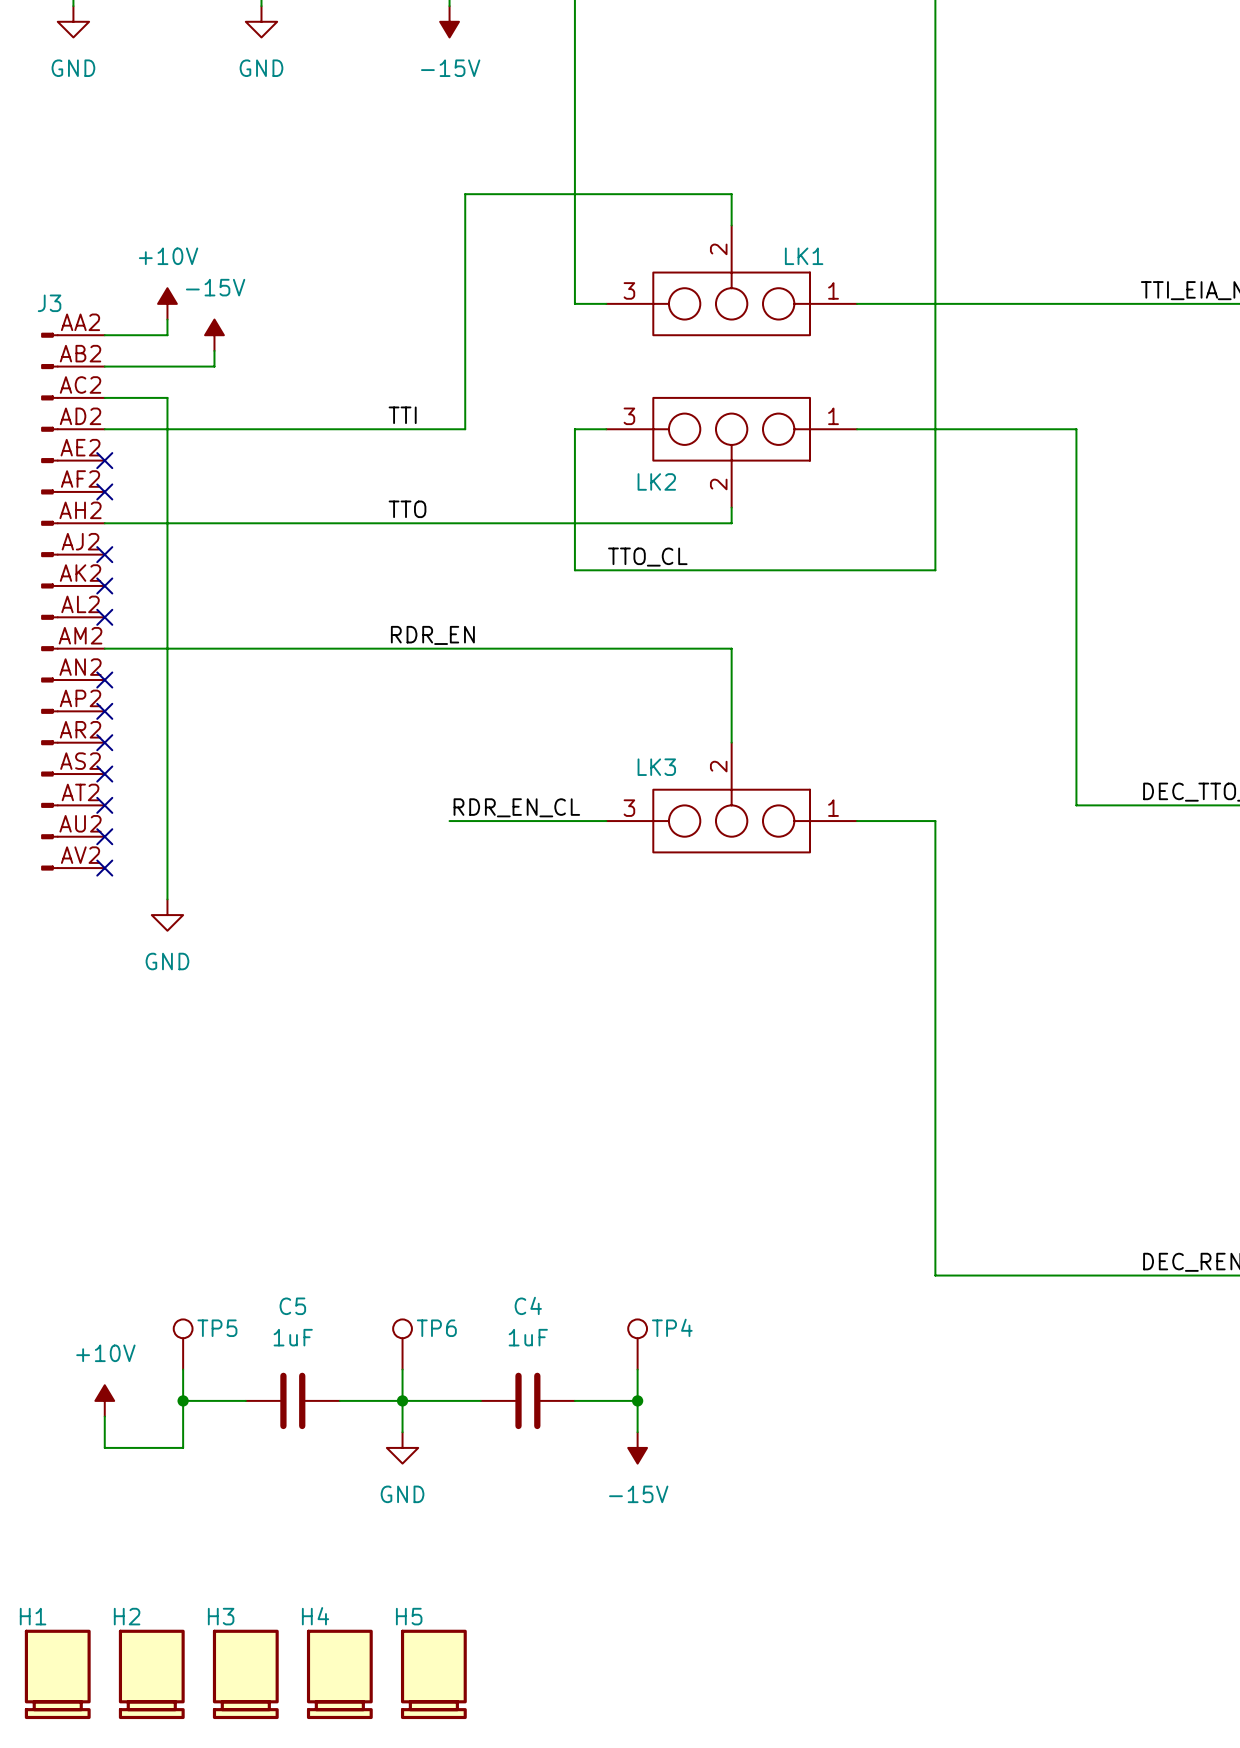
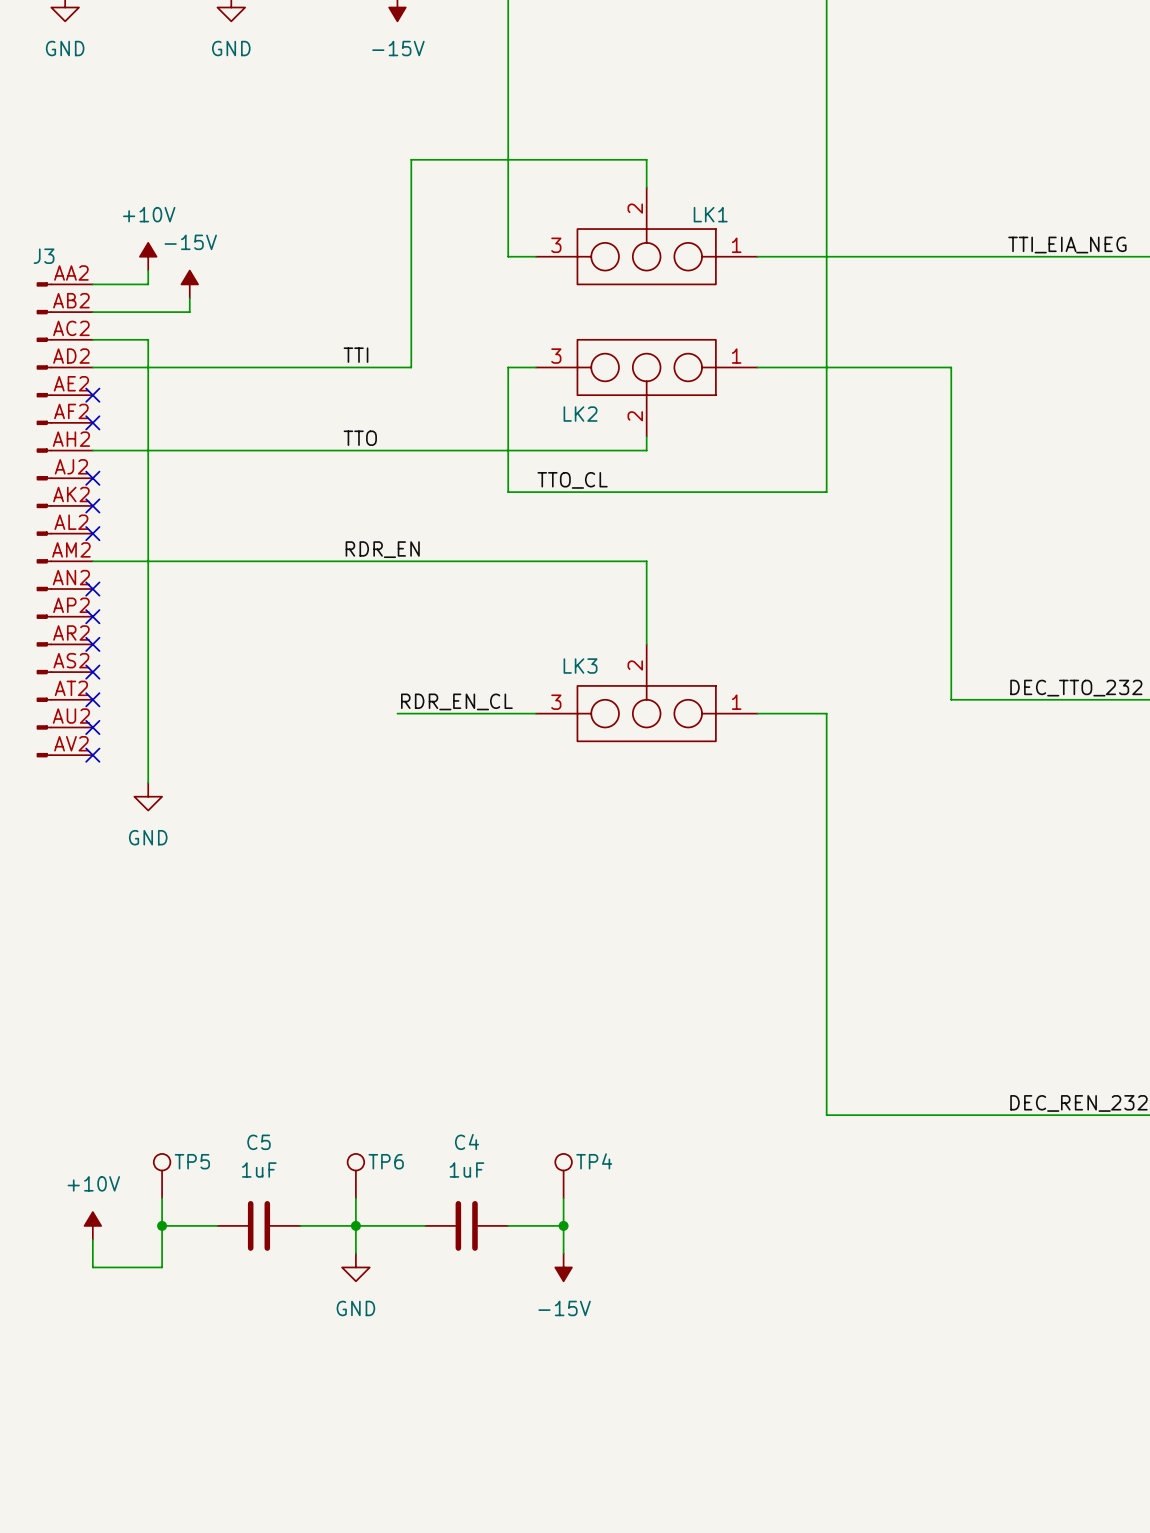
H1: (57, 1674) -> none
H2: (151, 1674) -> none
H3: (245, 1674) -> none
H4: (339, 1674) -> none
H5: (433, 1674) -> none

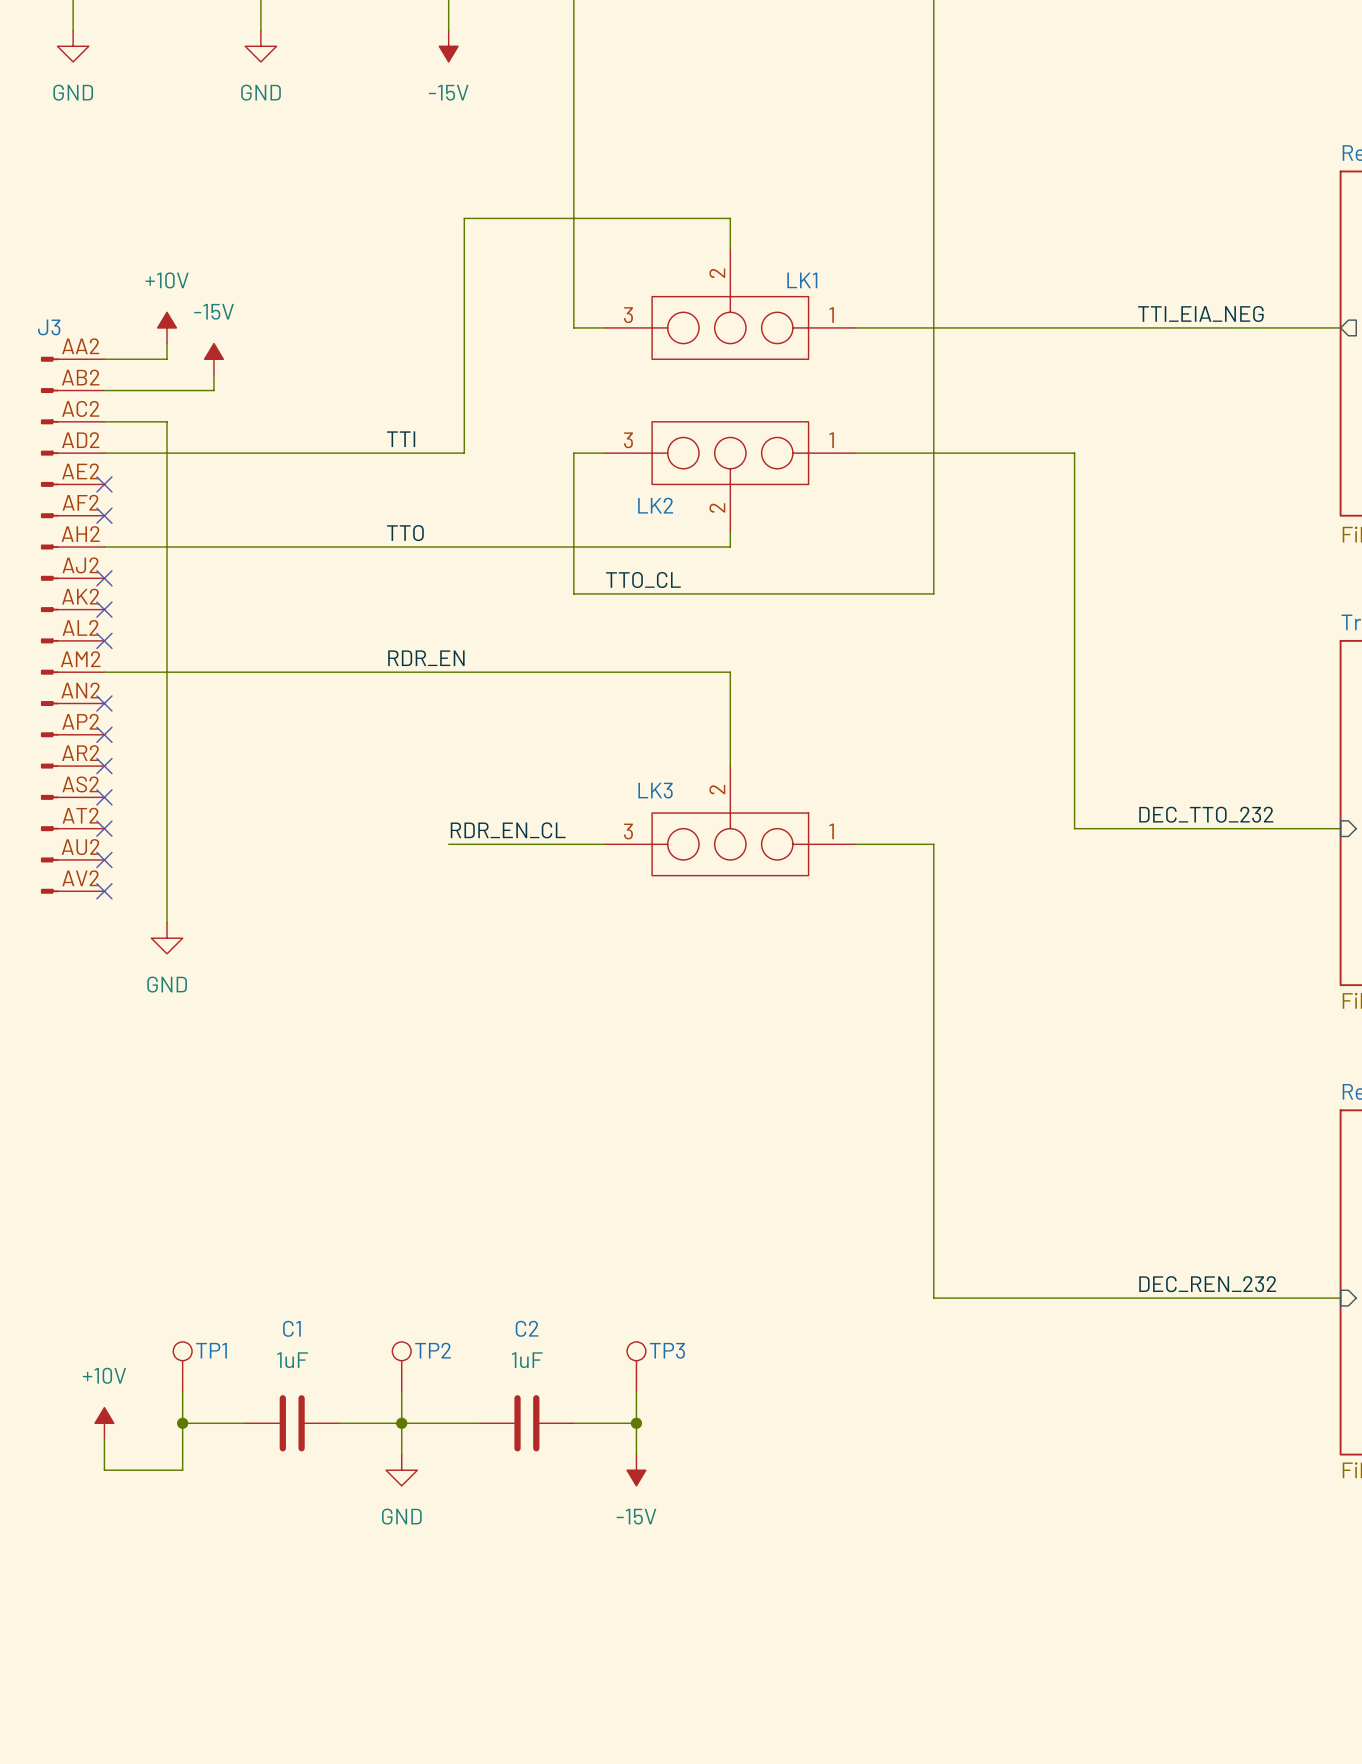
C4 name: C4 (467, 1141) -> C2 (527, 1328)
C5 name: C5 (258, 1142) -> C1 (291, 1328)
TP5 name: TP5 (192, 1161) -> TP1 (211, 1350)
TP6 name: TP6 (386, 1161) -> TP2 (433, 1350)
TP4 name: TP4 (594, 1161) -> TP3 (667, 1350)

